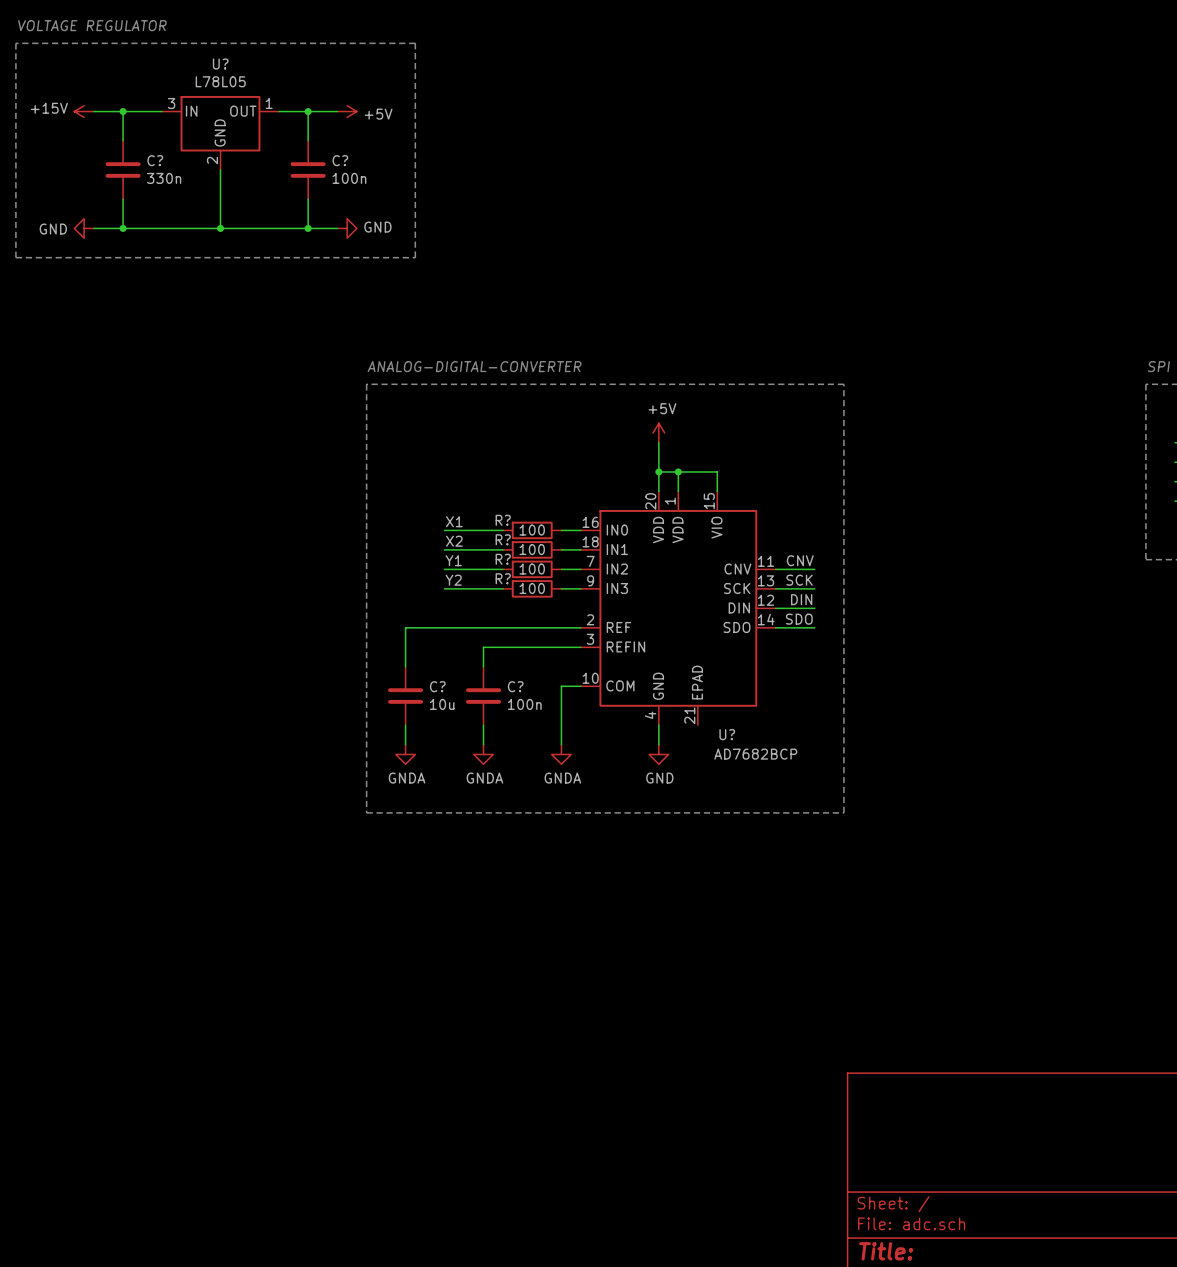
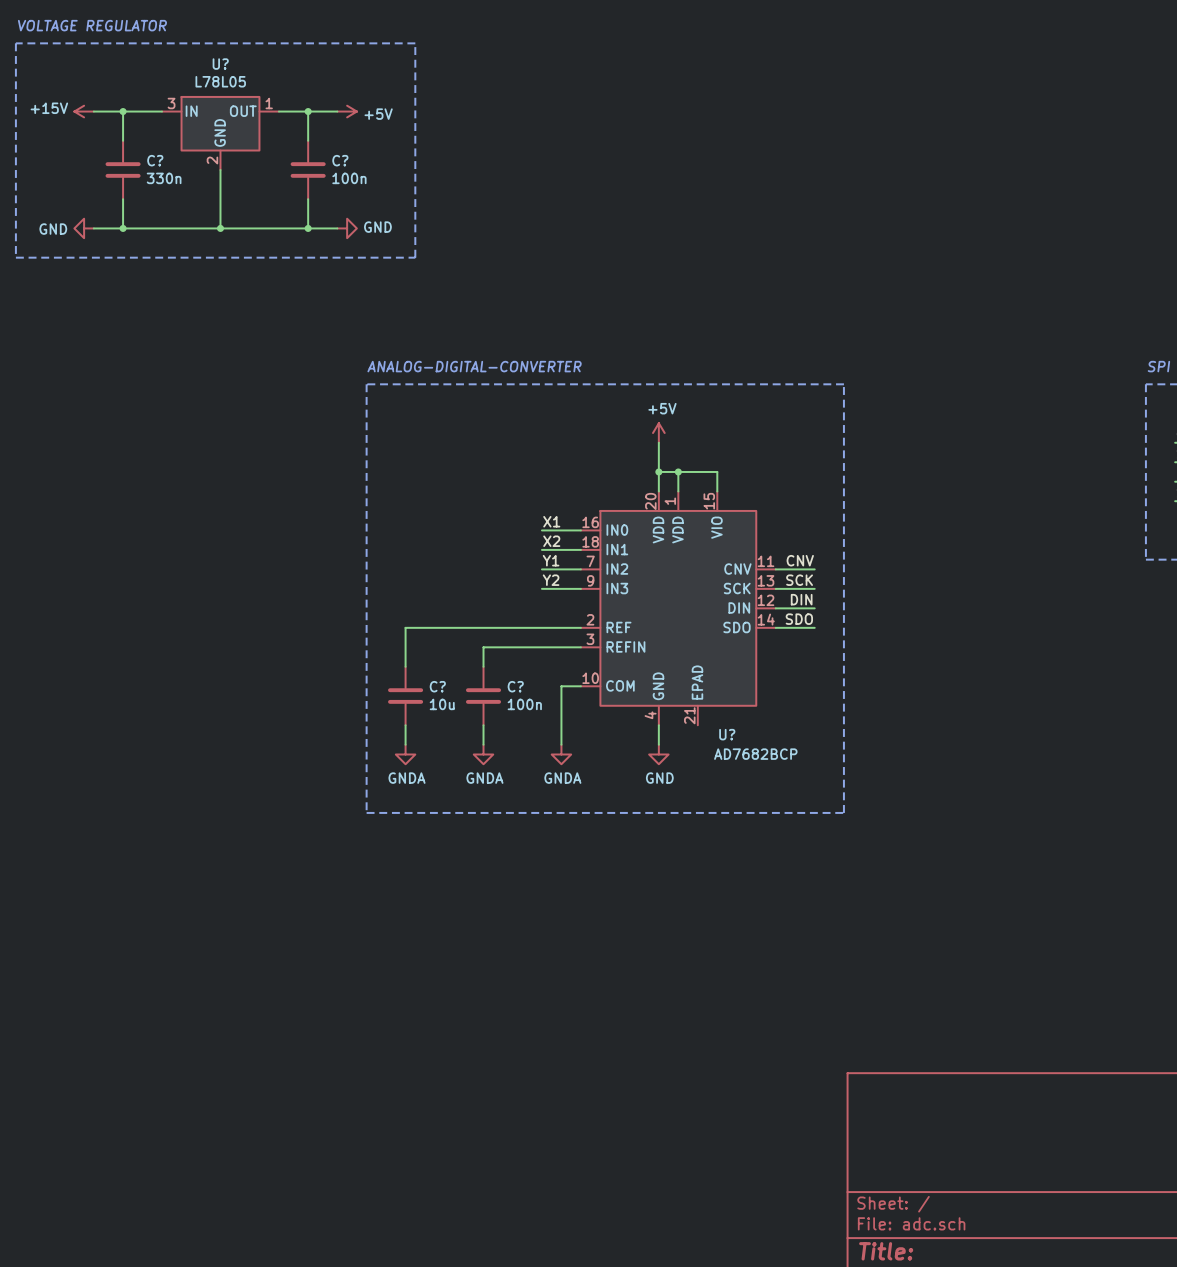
label position: X1 (454, 521) -> X1 (551, 521)
wire: (444, 530) (502, 530) -> none
R?: 100 (532, 530) -> none
label position: X2 (454, 541) -> X2 (551, 541)
wire: (444, 549) (502, 549) -> none
R?: 100 (532, 549) -> none
label position: Y1 (453, 560) -> Y1 (551, 560)
wire: (444, 569) (502, 569) -> none
R?: 100 (532, 569) -> none
label position: Y2 (453, 580) -> Y2 (551, 580)
wire: (444, 588) (502, 588) -> none
R?: 100 (532, 588) -> none

